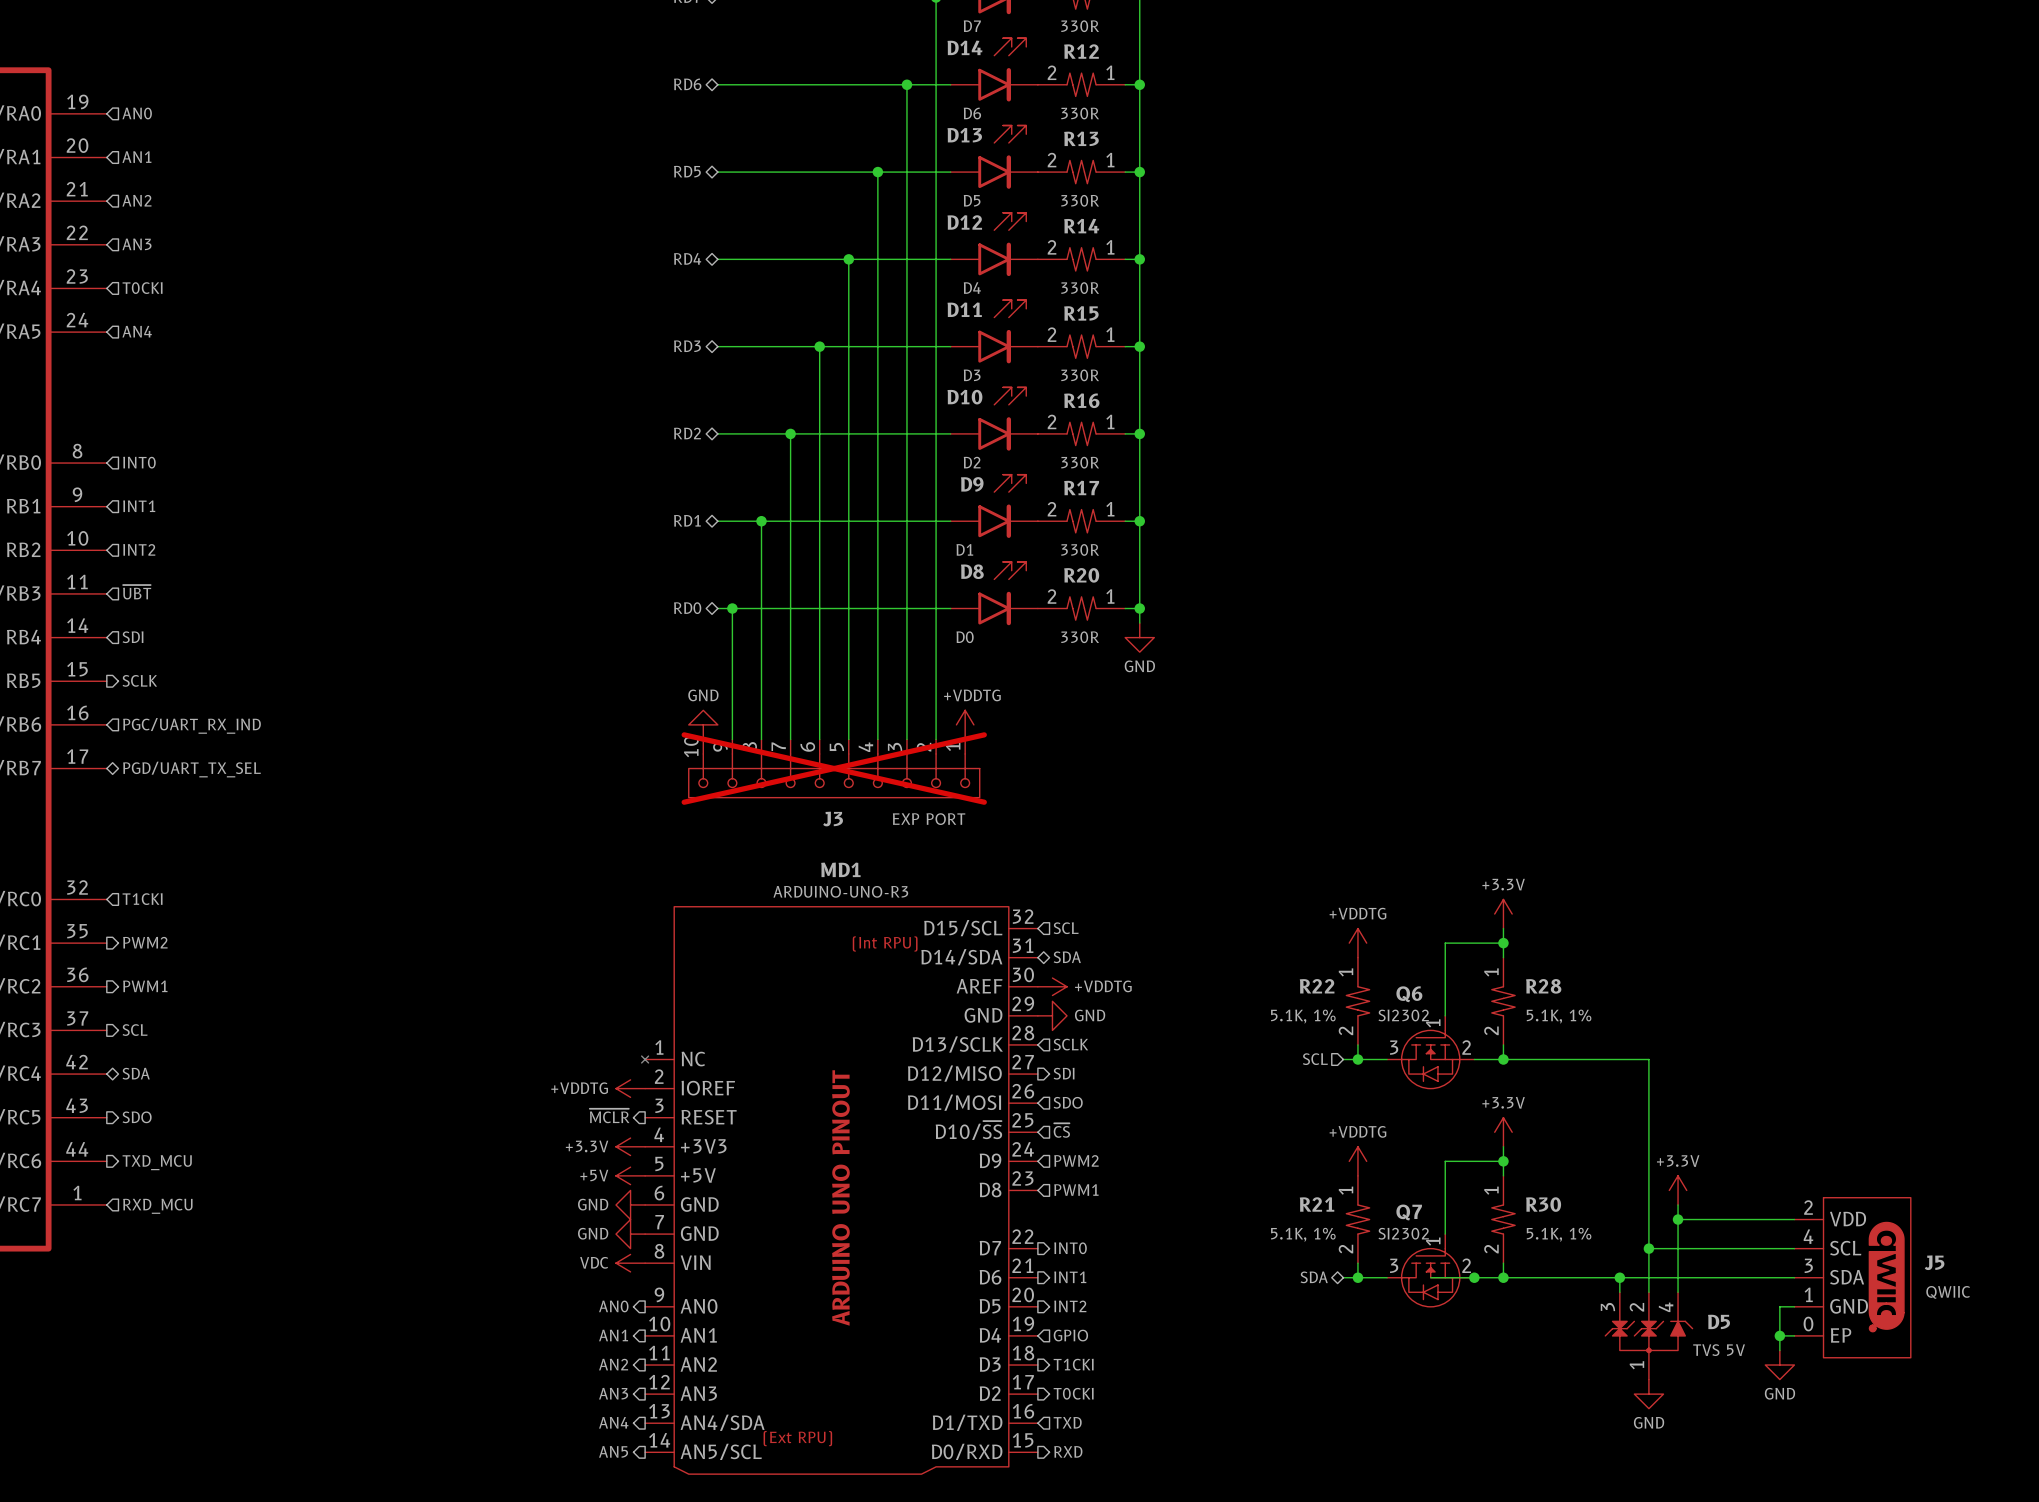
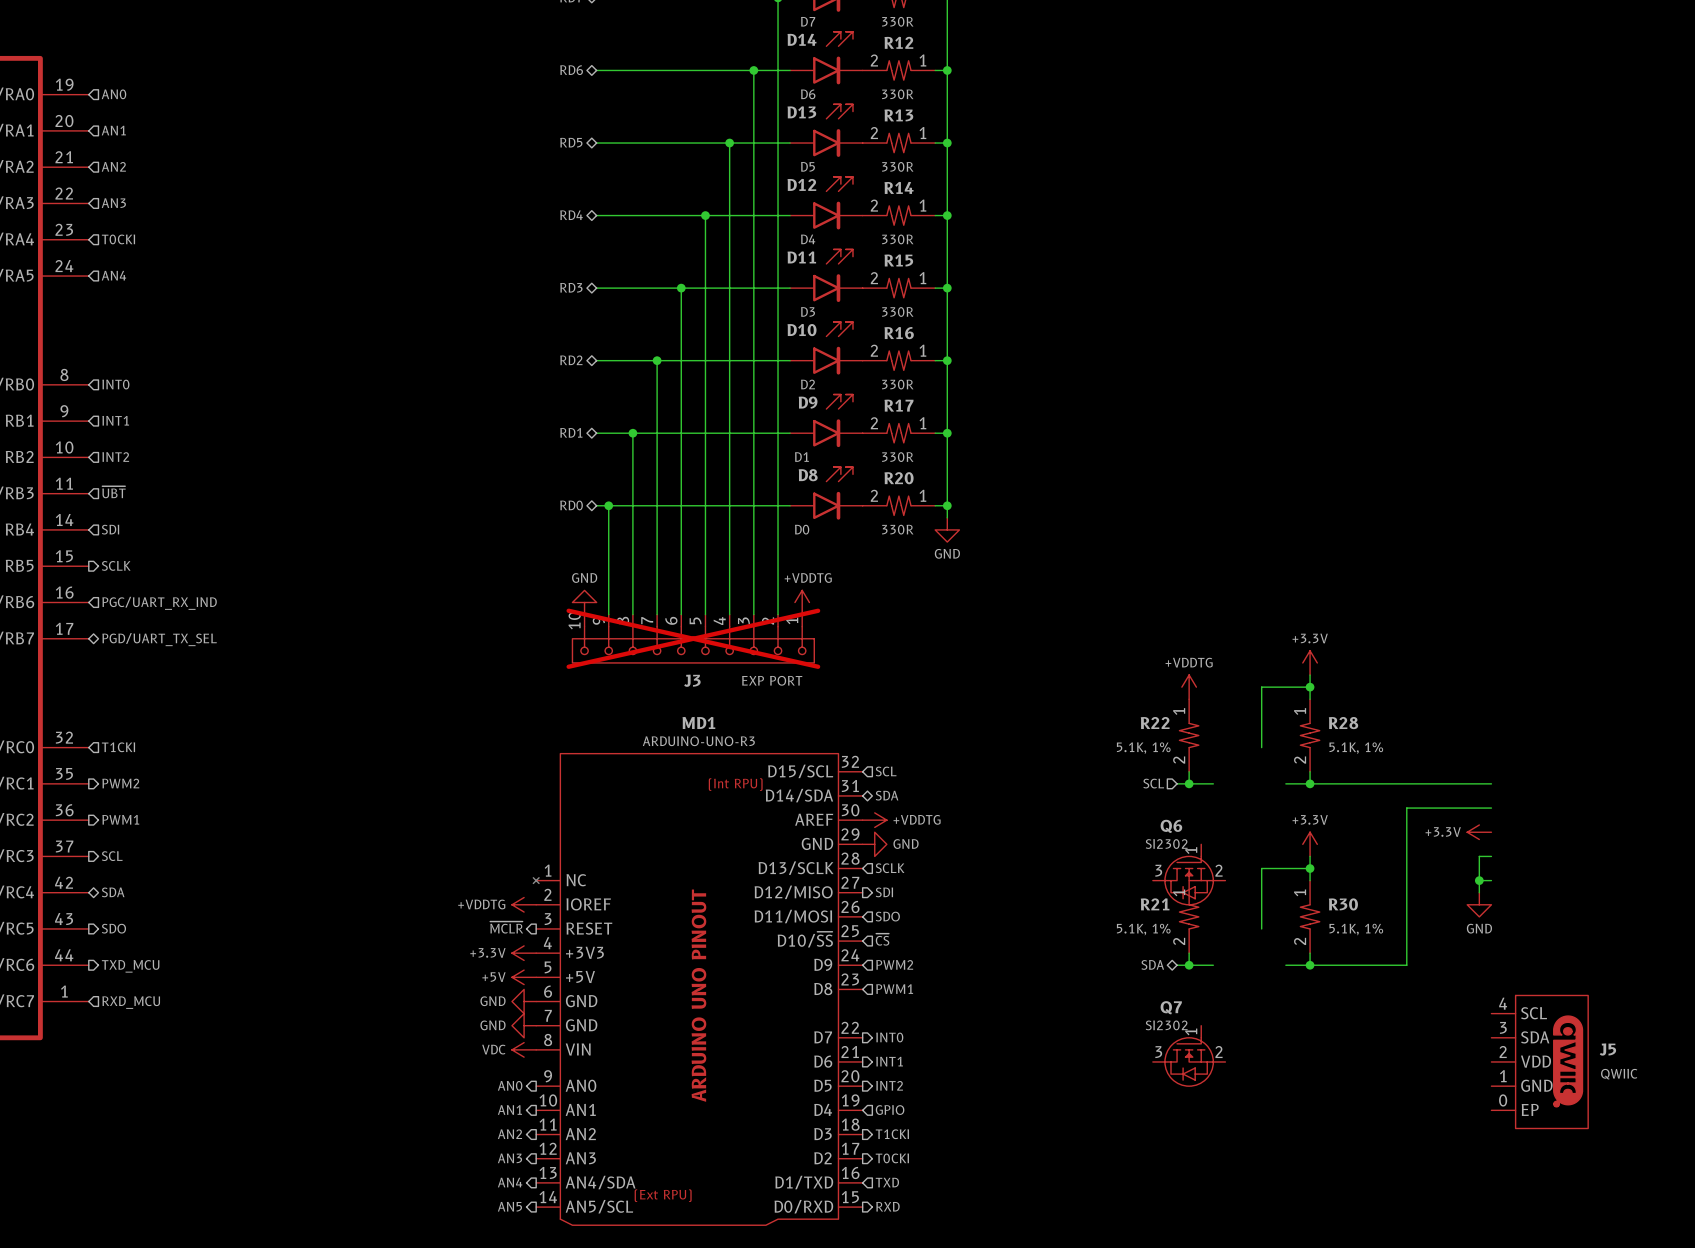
power symbol: none -> +3.3V (1310, 662)
wire: none -> (1310, 687) (1261, 687) (1261, 747)
junction: none -> (1310, 687)
power symbol: +3.3V (1503, 914) -> none
wire: (1503, 928) (1503, 957) -> (1310, 675) (1310, 699)
power symbol position: +VDDTG (1357, 943) -> +VDDTG (1189, 687)
junction: none -> (1189, 783)
wire: (1445, 943) (1445, 1015) -> (1201, 783) (1177, 783)
wire: (1459, 943) (1503, 943) -> none
junction: (1503, 943) -> none
wire: none -> (1285, 783) (1491, 783)
junction: none -> (1310, 783)
wire: none -> (1491, 808) (1406, 808) (1406, 965) (1285, 965)
R22 position: (1357, 1001) -> (1189, 735)
R28 position: (1503, 1001) -> (1310, 735)
power symbol: none -> +3.3V (1479, 832)
power symbol: none -> +3.3V (1310, 844)
wire: (1357, 1044) (1357, 1059) -> (1189, 771) (1189, 783)
wire: (1503, 1044) (1503, 1059) -> (1310, 771) (1310, 783)
wire: none -> (1310, 868) (1261, 868) (1261, 928)
junction: none -> (1310, 868)
hierarchical label position: SCL (1315, 1059) -> SCL (1153, 783)
wire: (1343, 1059) (1387, 1059) -> none
junction: (1357, 1059) -> none
wire: (1474, 1059) (1648, 1059) (1648, 1292) -> none
junction: (1503, 1059) -> none
junction: none -> (1479, 880)
power symbol: none -> GND (1479, 904)
power symbol: +3.3V (1503, 1132) -> none
wire: (1503, 1146) (1503, 1175) -> (1310, 856) (1310, 880)
power symbol: +VDDTG (1357, 1161) -> none
junction: none -> (1189, 965)
wire: (1445, 1161) (1445, 1234) -> (1201, 965) (1177, 965)
wire: (1459, 1161) (1503, 1161) -> none
junction: (1503, 1161) -> none
junction: none -> (1310, 965)
power symbol: +3.3V (1678, 1190) -> none
wire: (1678, 1204) (1678, 1292) -> none
J5 pin number: 2 (1808, 1207) -> 4 (1503, 1003)
R21 position: (1357, 1219) -> (1189, 916)
R30 position: (1503, 1219) -> (1310, 916)
wire: (1678, 1219) (1794, 1219) -> none
junction: (1678, 1219) -> none
J5 pin name: VDD (1848, 1219) -> SCL (1534, 1013)
J5 pin number: 4 (1808, 1236) -> 3 (1503, 1027)
wire: (1648, 1248) (1794, 1248) -> none
junction: (1648, 1248) -> none
J5 pin name: SCL (1845, 1248) -> SDA (1535, 1037)
wire: (1357, 1263) (1357, 1277) -> (1189, 953) (1189, 965)
wire: (1503, 1263) (1503, 1277) -> (1310, 953) (1310, 965)
J5 pin number: 3 (1808, 1265) -> 2 (1503, 1052)
hierarchical label position: SDA (1314, 1277) -> SDA (1152, 964)
wire: (1343, 1277) (1387, 1277) -> none
junction: (1357, 1277) -> none
wire: (1430, 1277) (1794, 1277) -> none
junction: (1474, 1277) -> none
junction: (1503, 1277) -> none
wire: (1619, 1277) (1619, 1292) -> none
junction: (1619, 1277) -> none
J5 pin name: SDA (1847, 1277) -> VDD (1535, 1061)
wire: (1794, 1306) (1779, 1306) (1779, 1350) -> (1491, 856) (1479, 856) (1479, 892)
D5: TVS 5V (1648, 1335) -> none
wire: (1779, 1335) (1794, 1335) -> (1479, 880) (1491, 880)
junction: (1779, 1335) -> none
power symbol: GND (1779, 1365) -> none
power symbol: GND (1648, 1394) -> none

